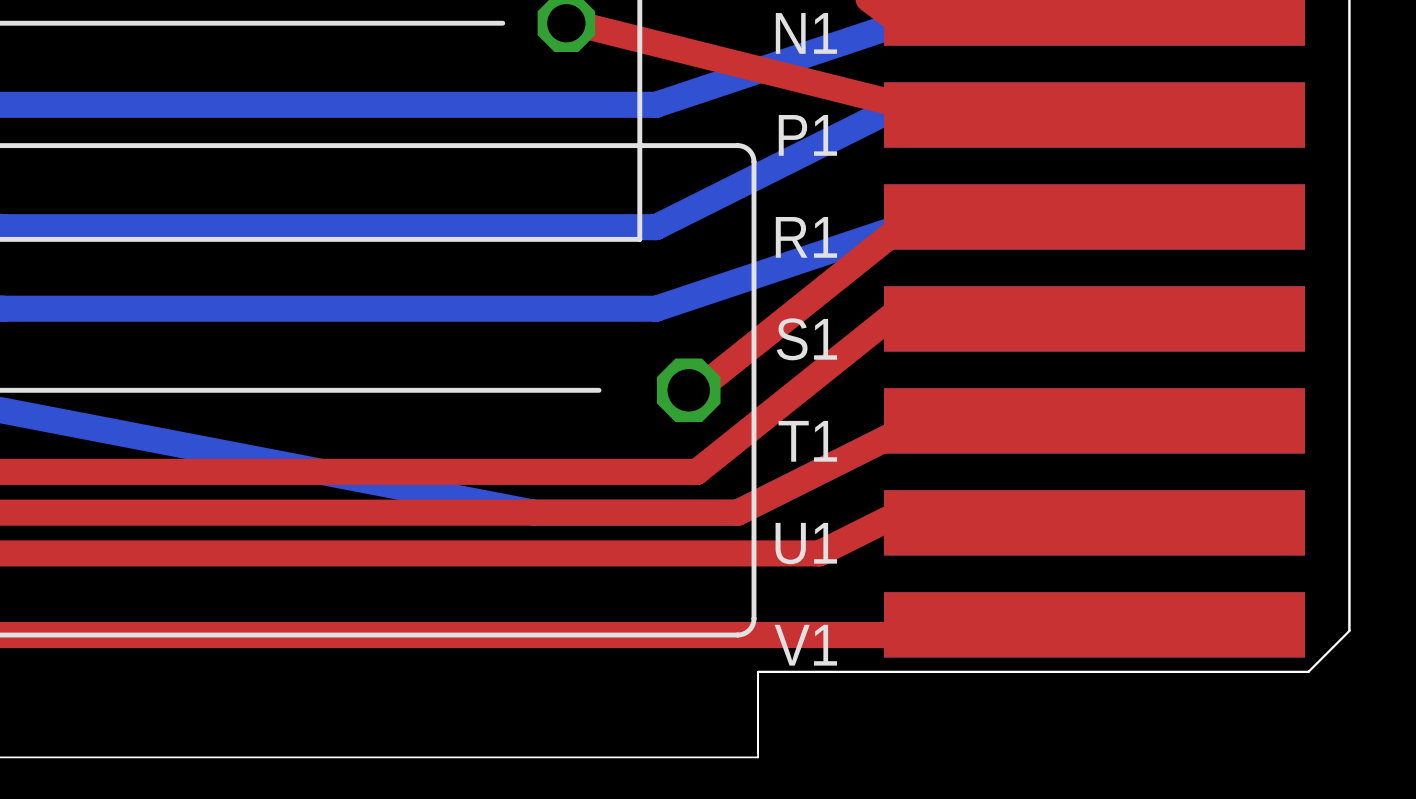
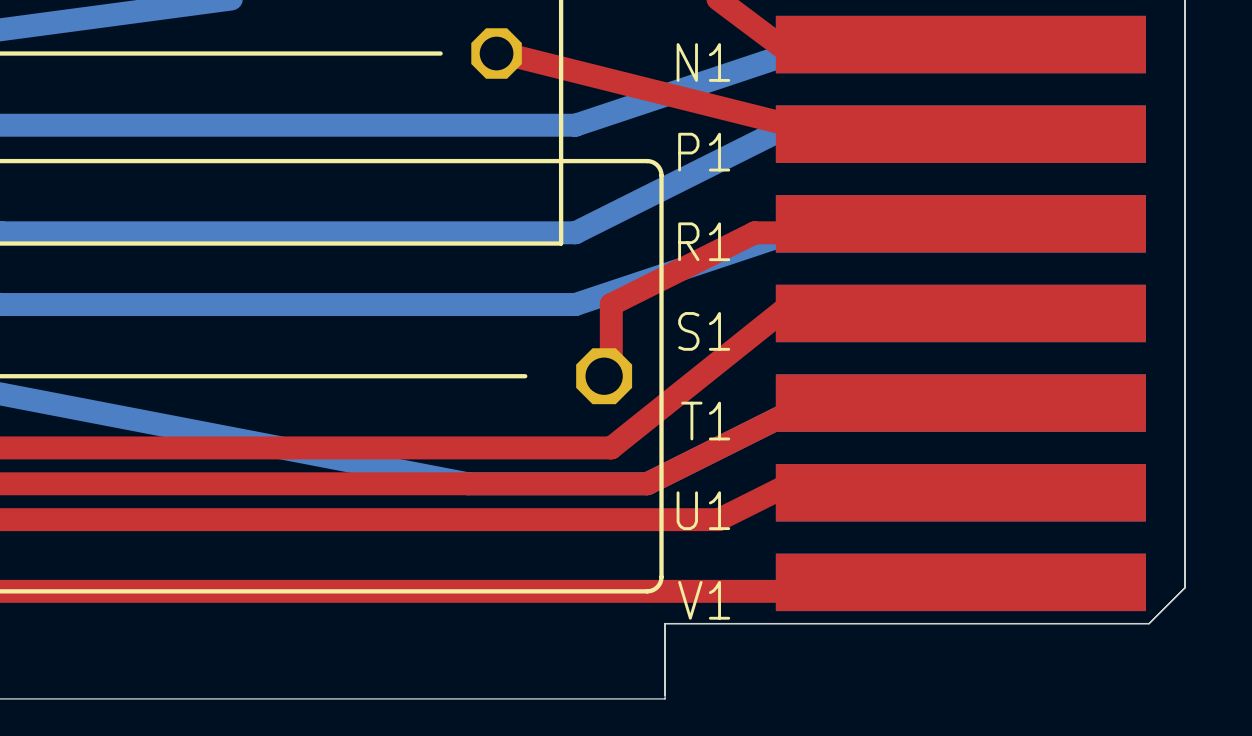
top track: (900, 227) (696, 390) -> (790, 232) (754, 232) (611, 304) (611, 376)

